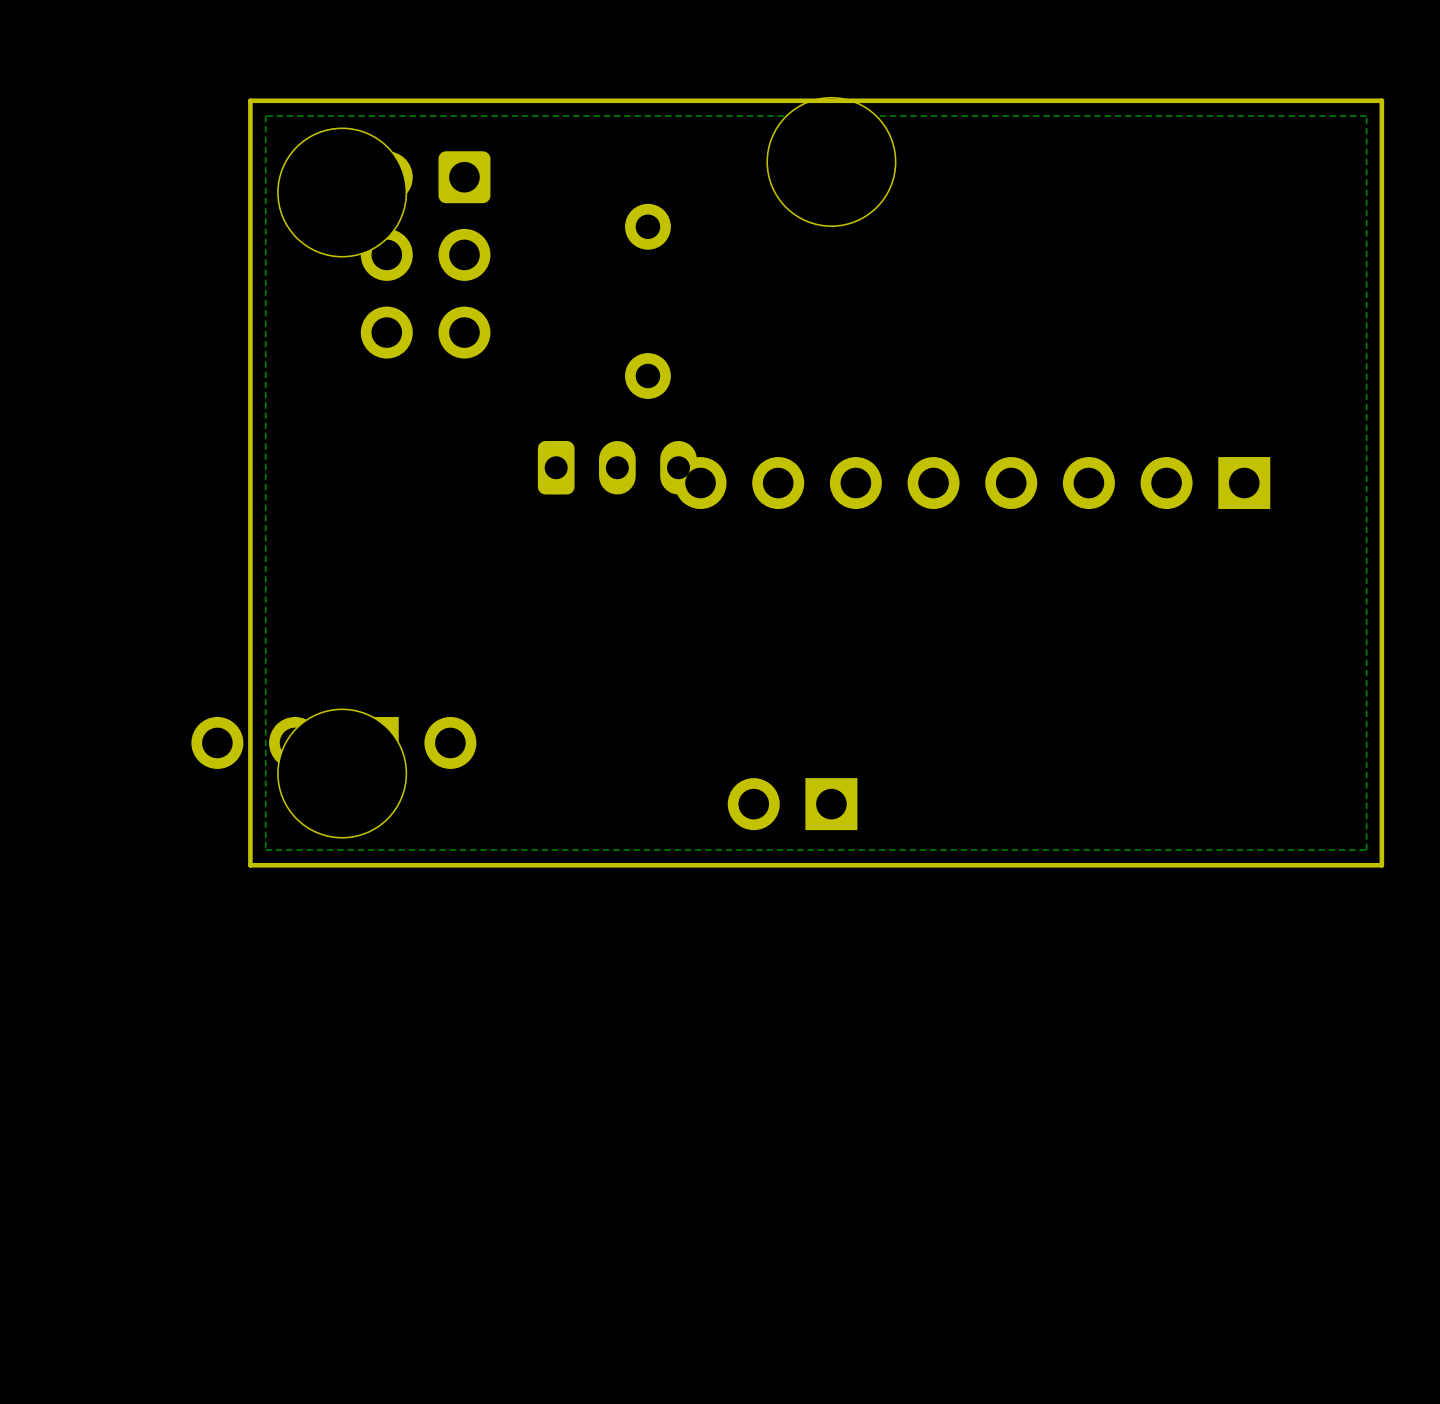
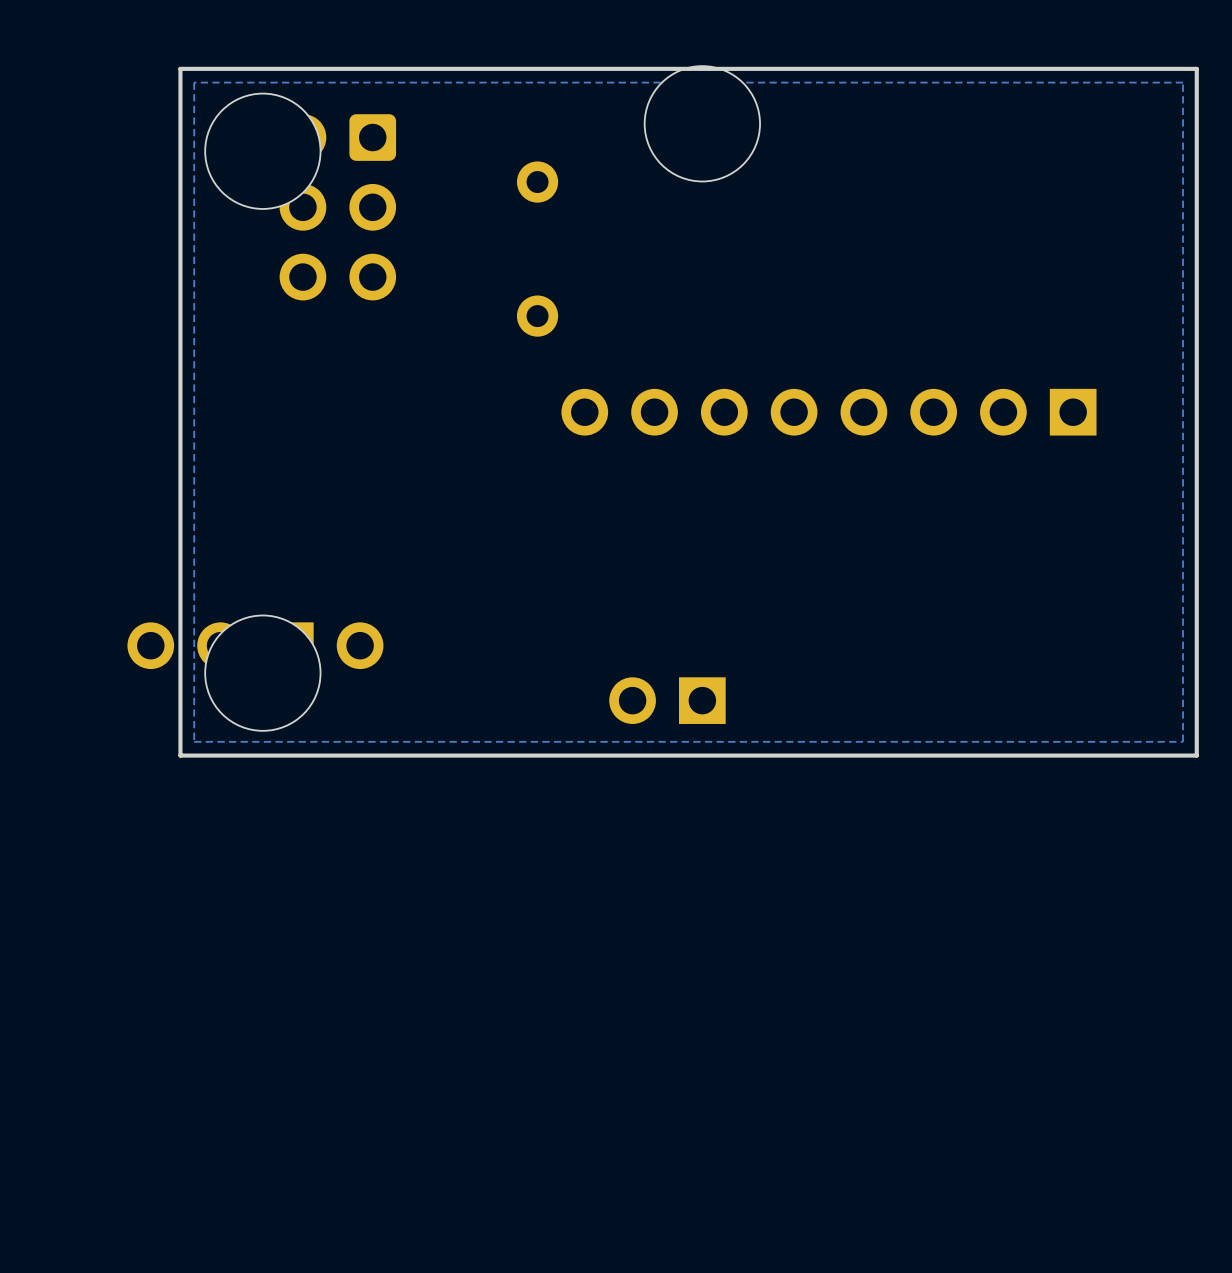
part: (617, 467) -> none

